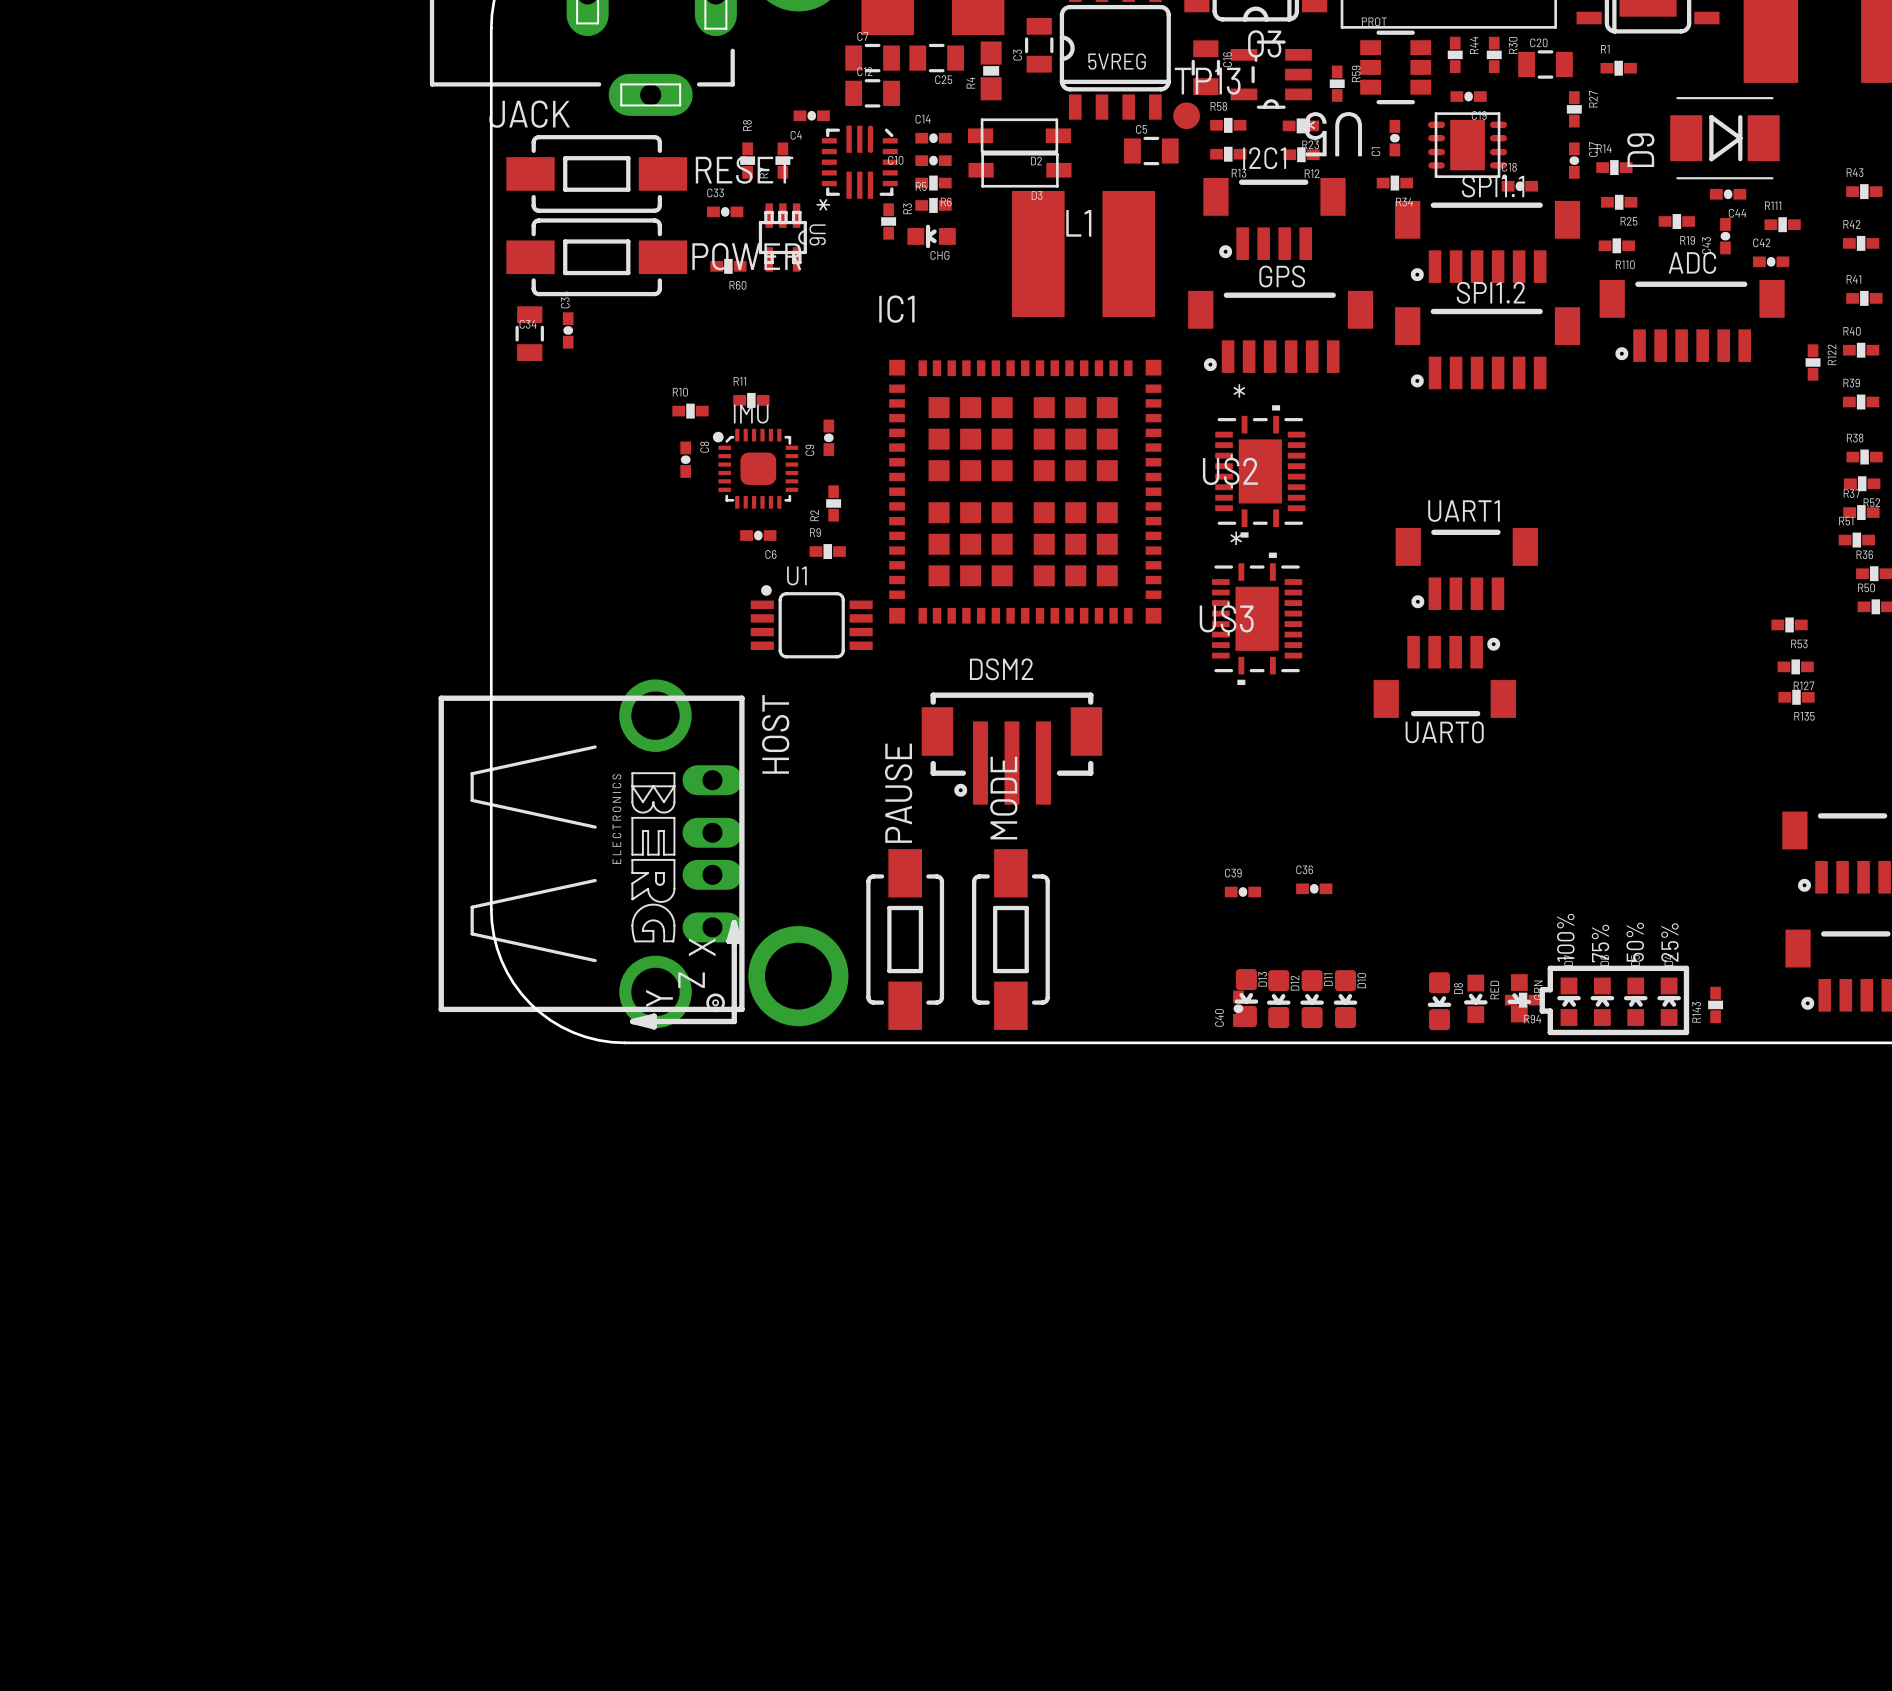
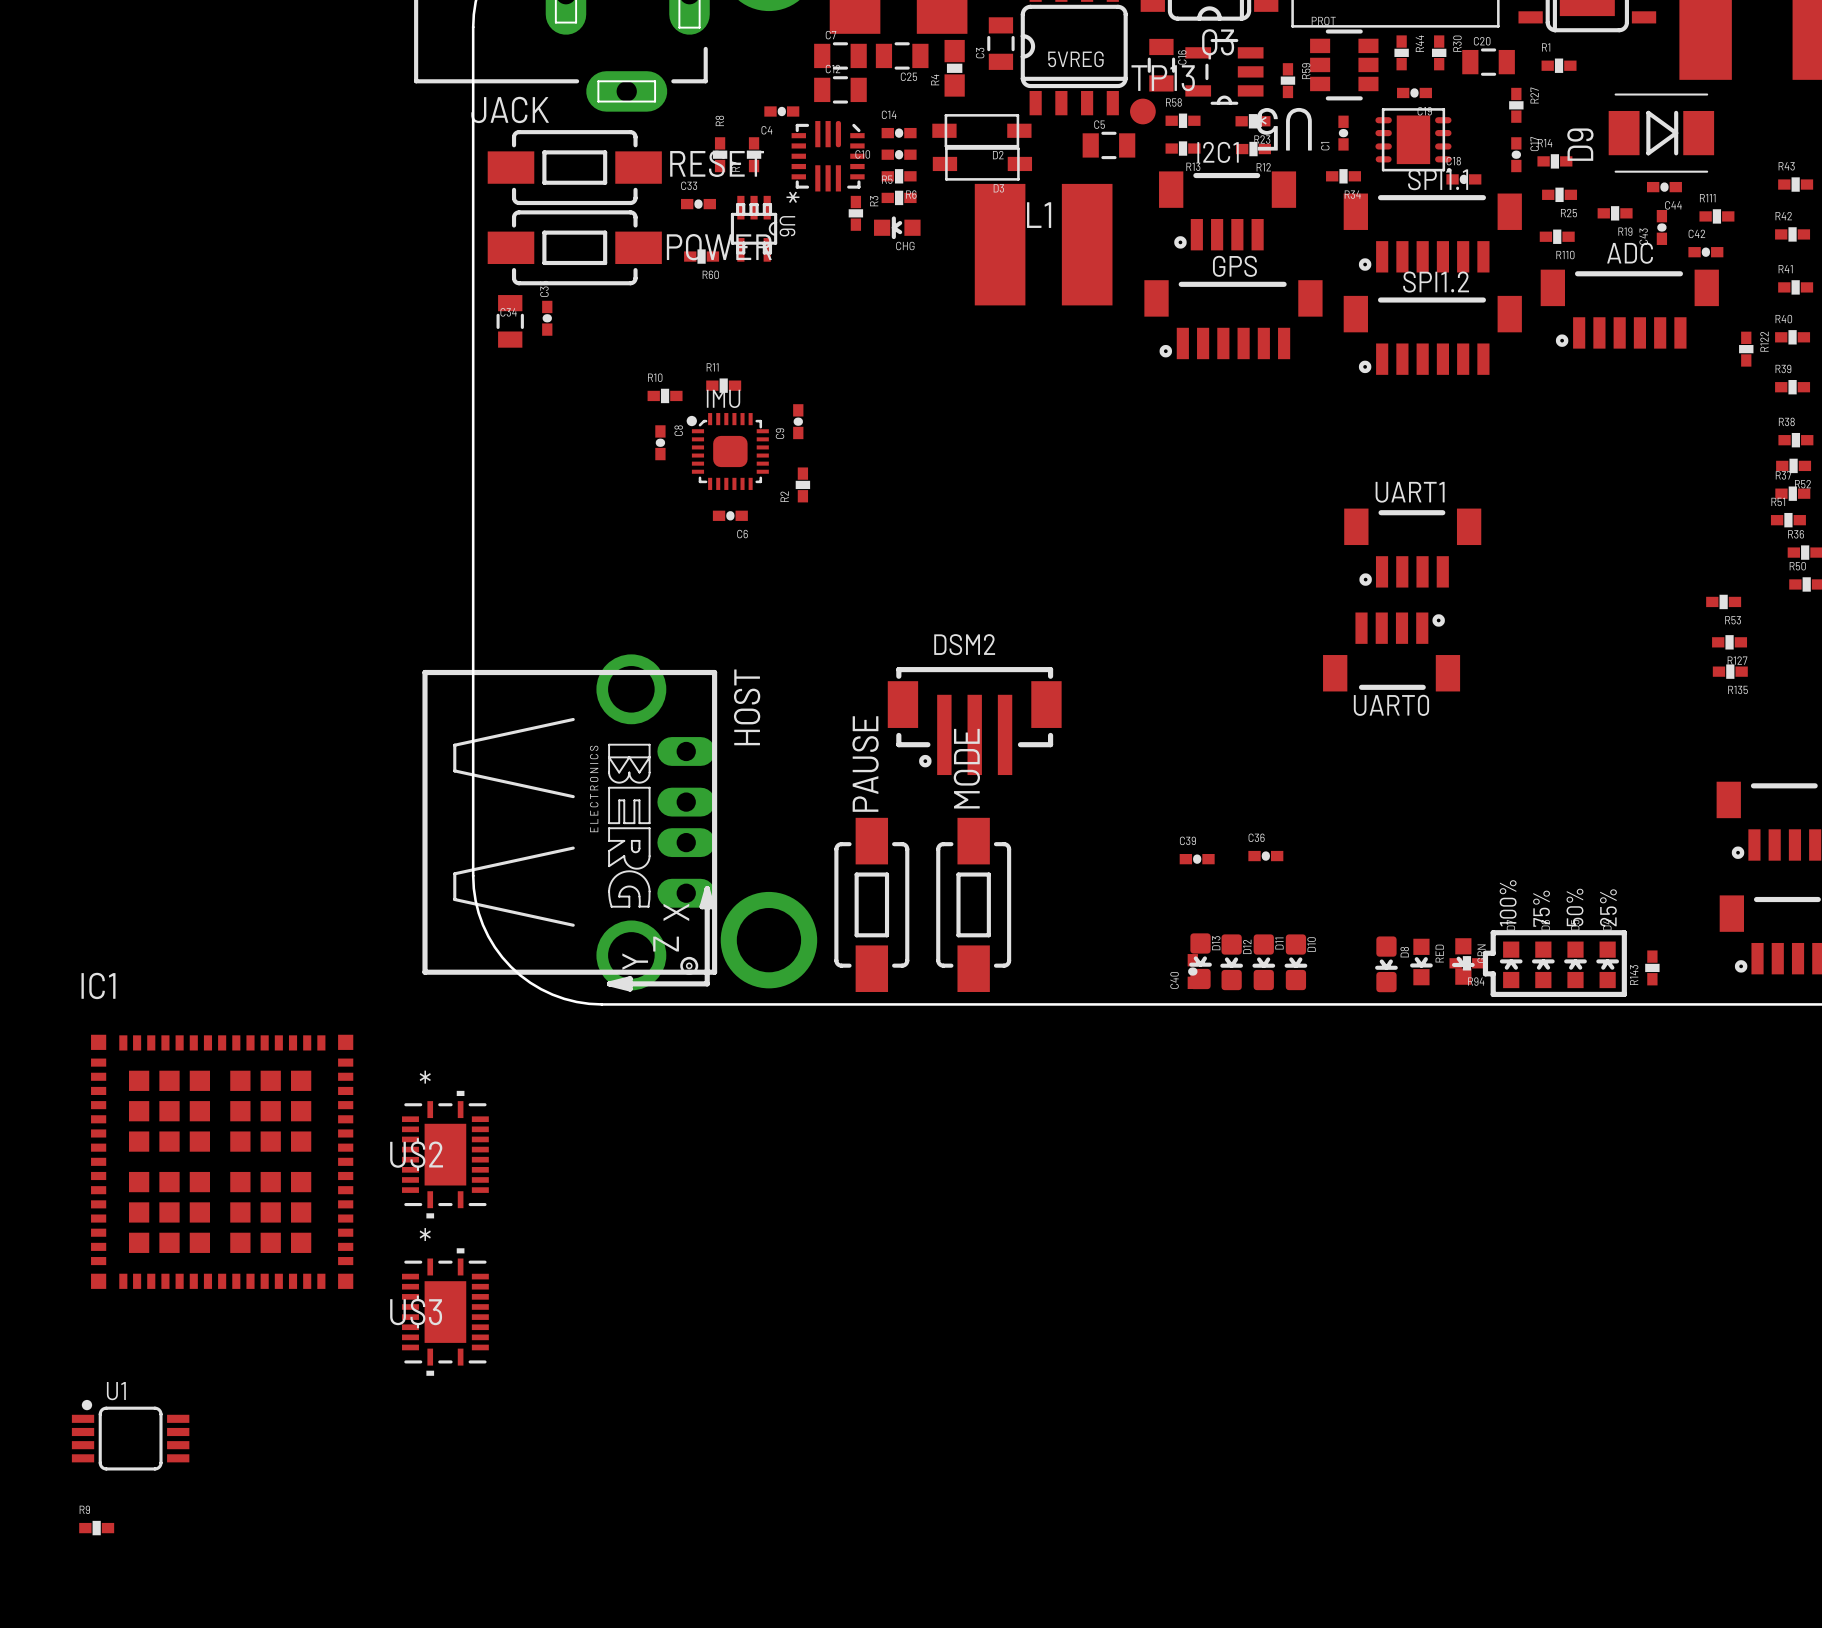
U$2 position: (1260, 471) -> (445, 1154)
IC1 position: (1025, 491) -> (222, 1161)
R9 position: (827, 551) -> (96, 1528)
U$3 position: (1257, 618) -> (445, 1312)
U1 position: (811, 621) -> (130, 1435)

